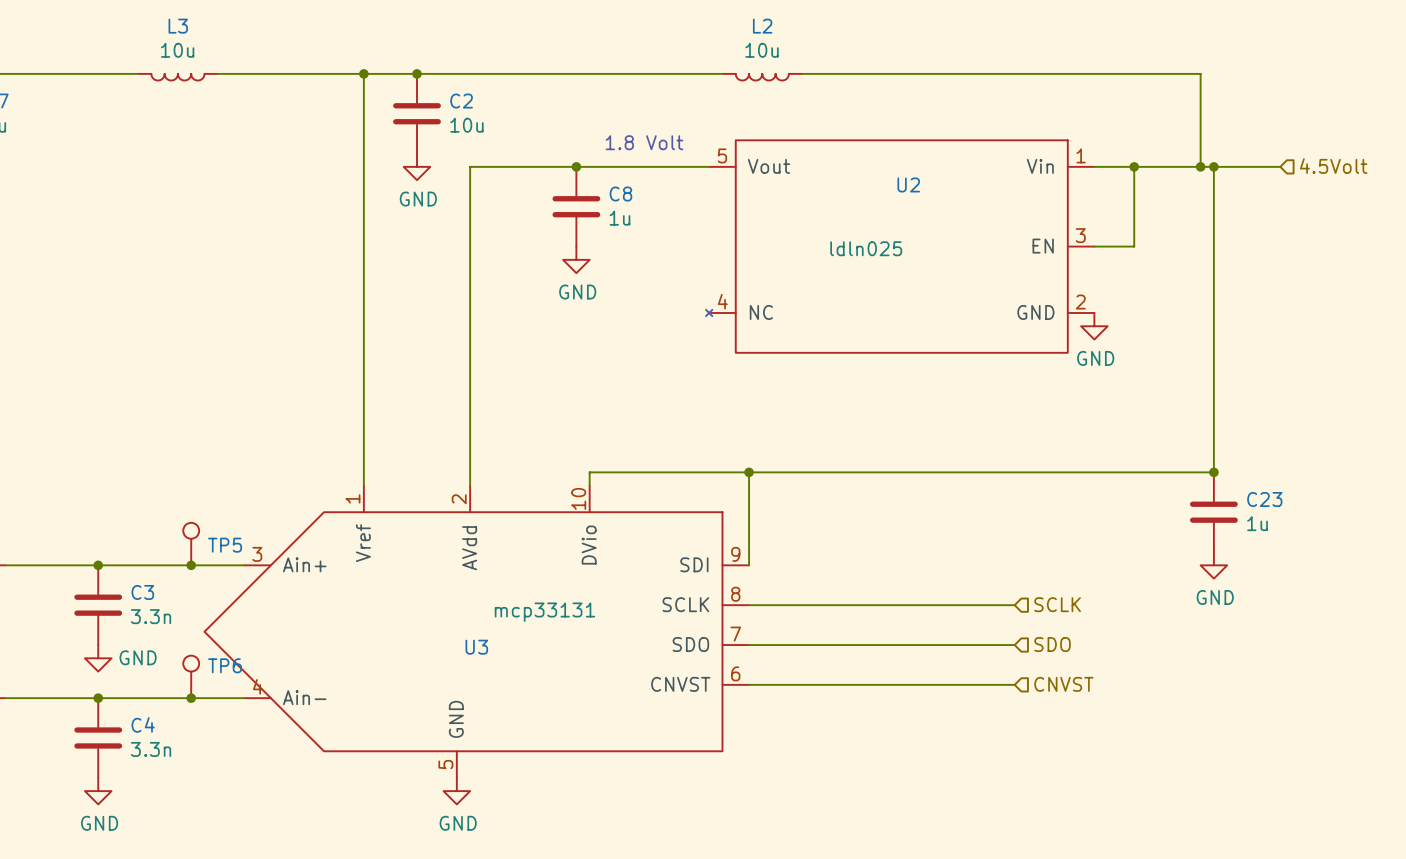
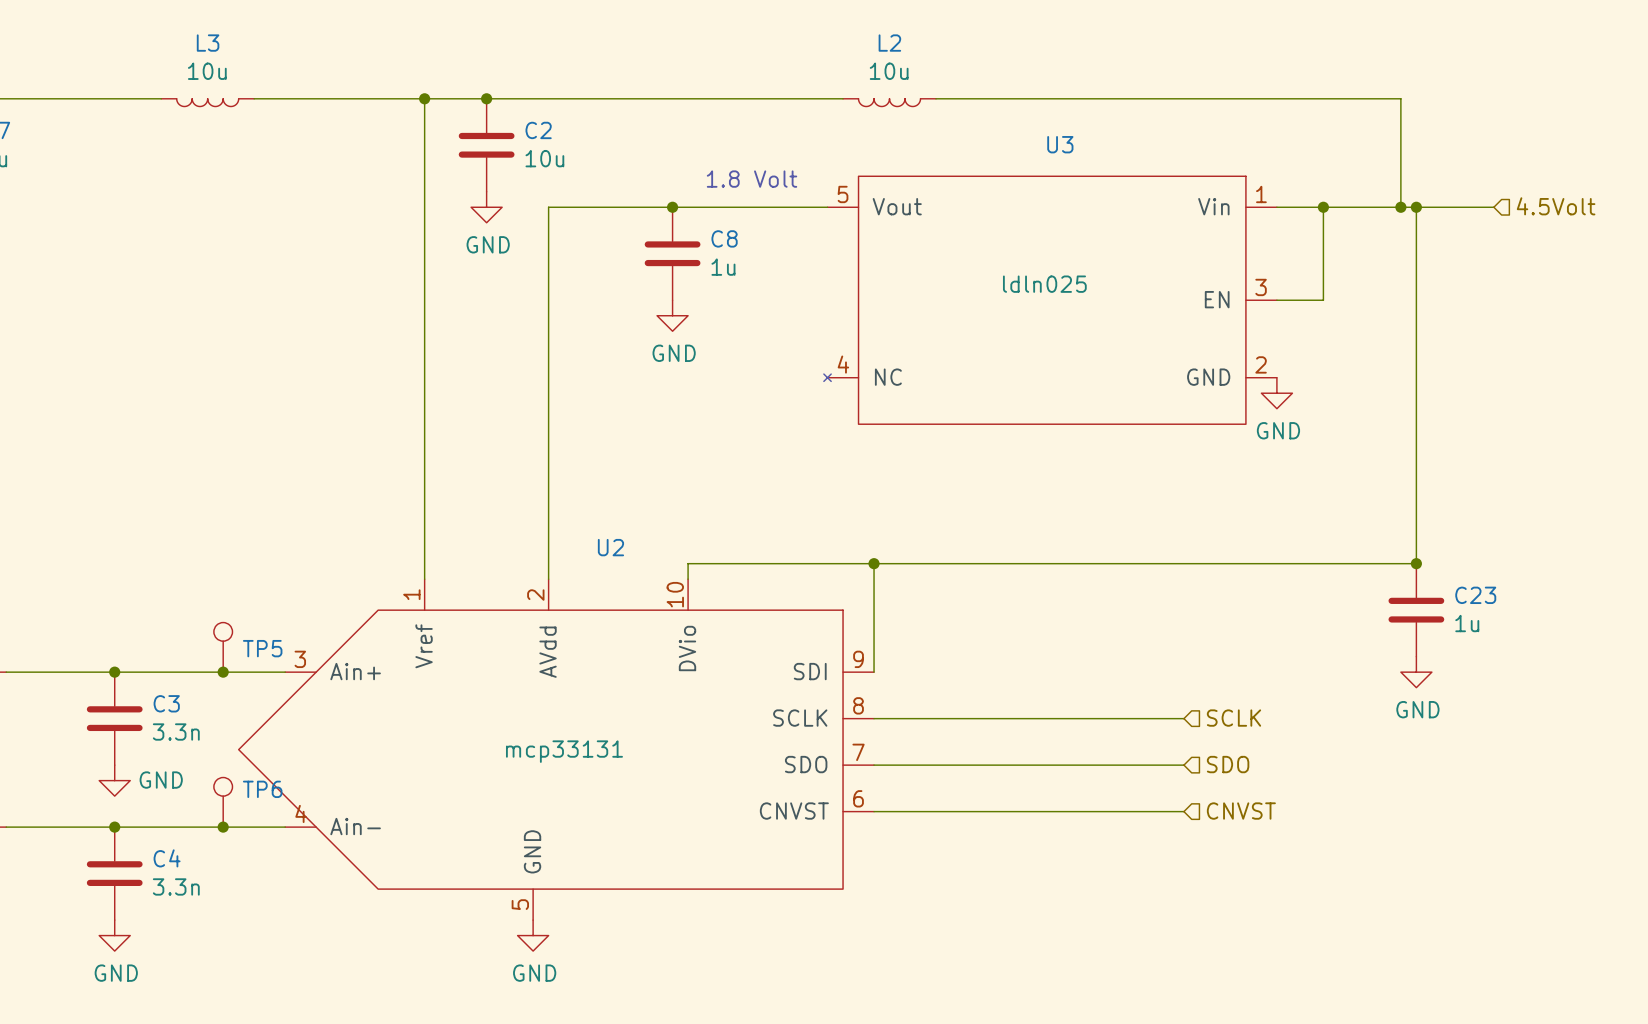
U2 name: U2 (908, 184) -> U3 (1060, 144)
U2 value position: ldln025 (866, 248) -> ldln025 (1044, 284)
U3 value position: mcp33131 (544, 612) -> mcp33131 (564, 751)
U3 name: U3 (476, 647) -> U2 (610, 547)

